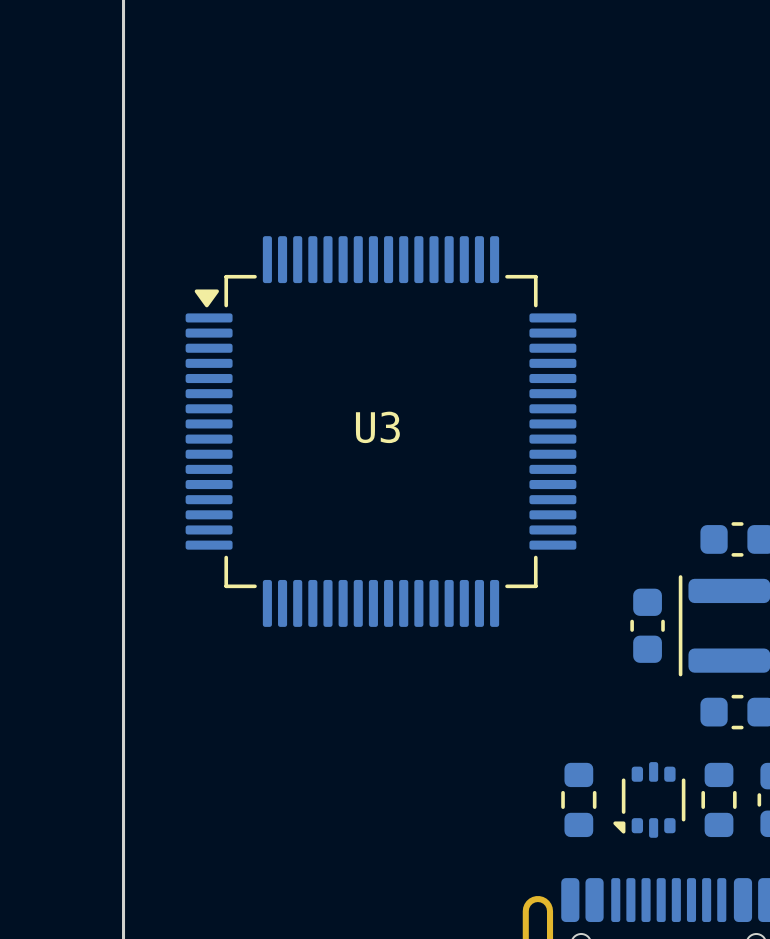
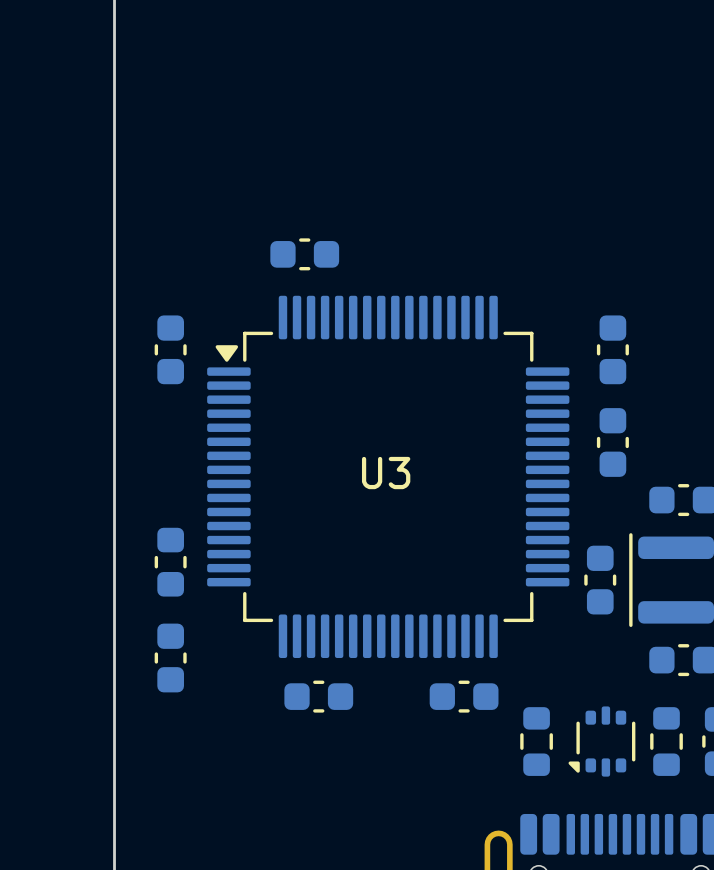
part: none -> (304, 254)
part: none -> (170, 349)
part: none -> (612, 349)
U3 position: (381, 431) -> (388, 476)
part: none -> (612, 442)
part: none -> (170, 562)
part: none -> (170, 657)
part: none -> (318, 696)
part: none -> (464, 696)

